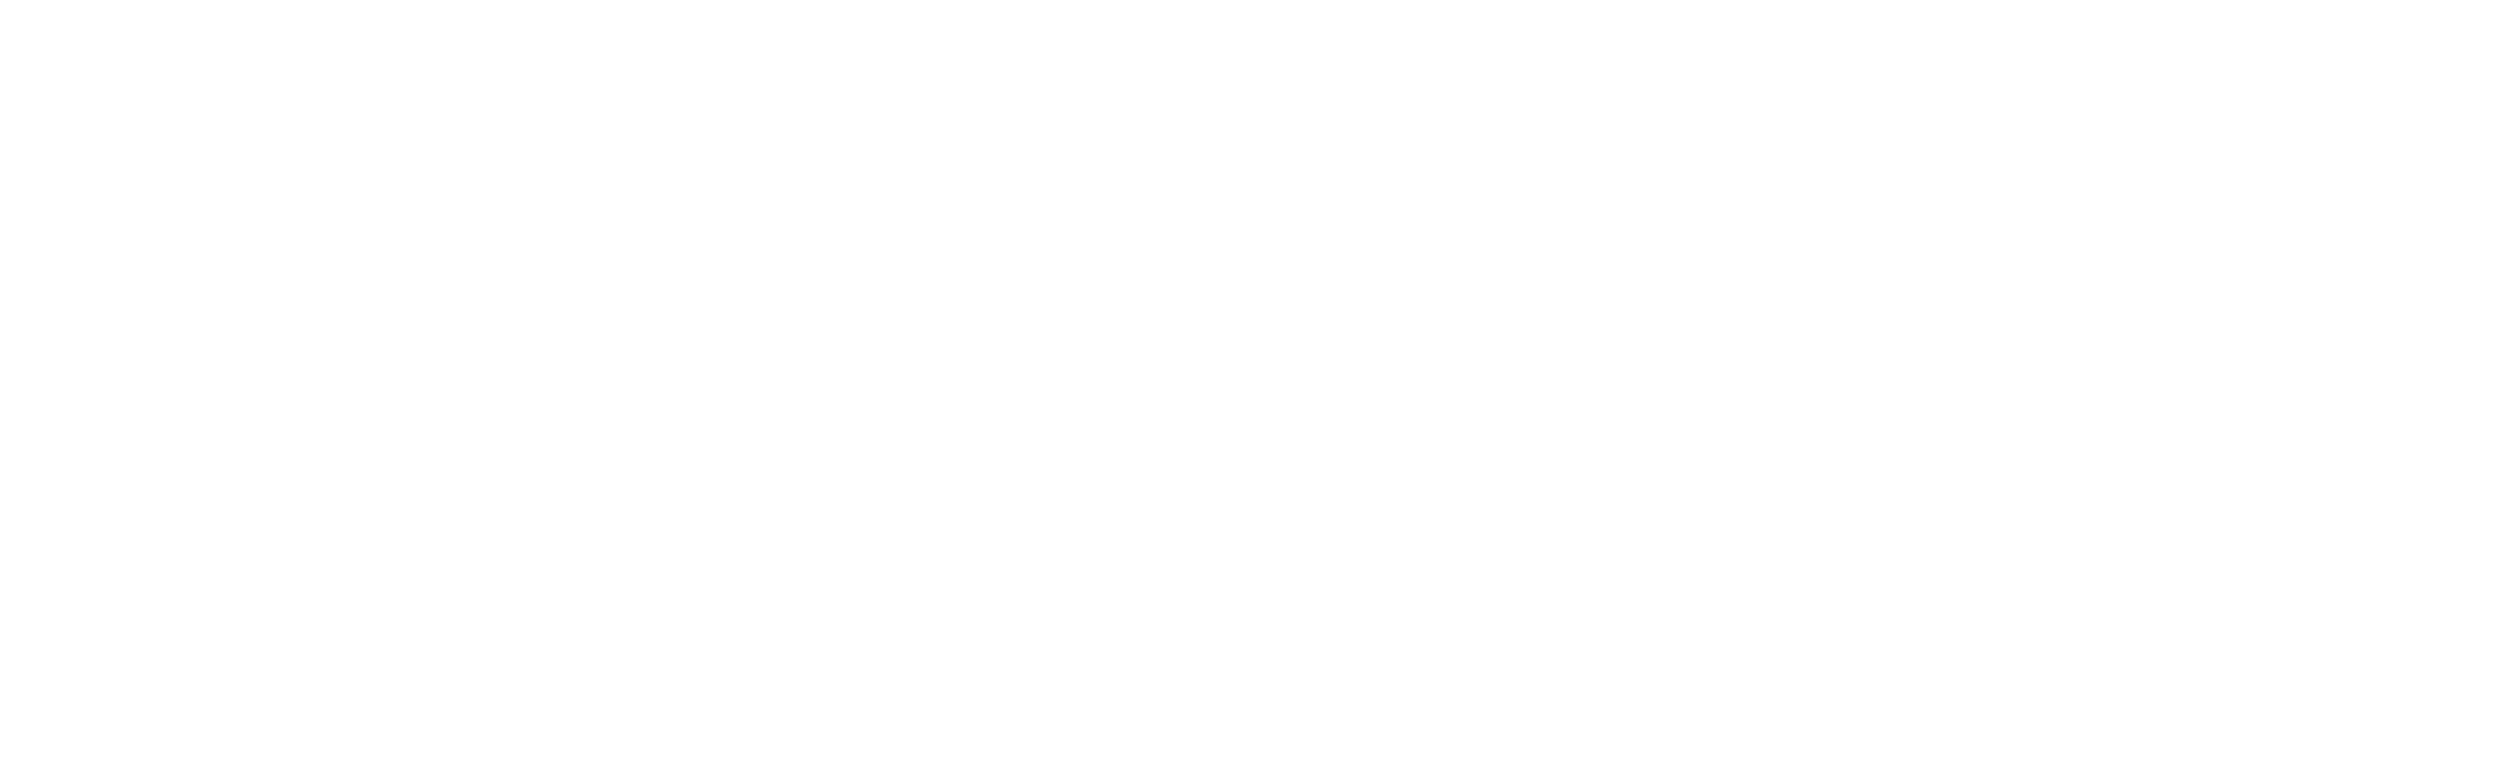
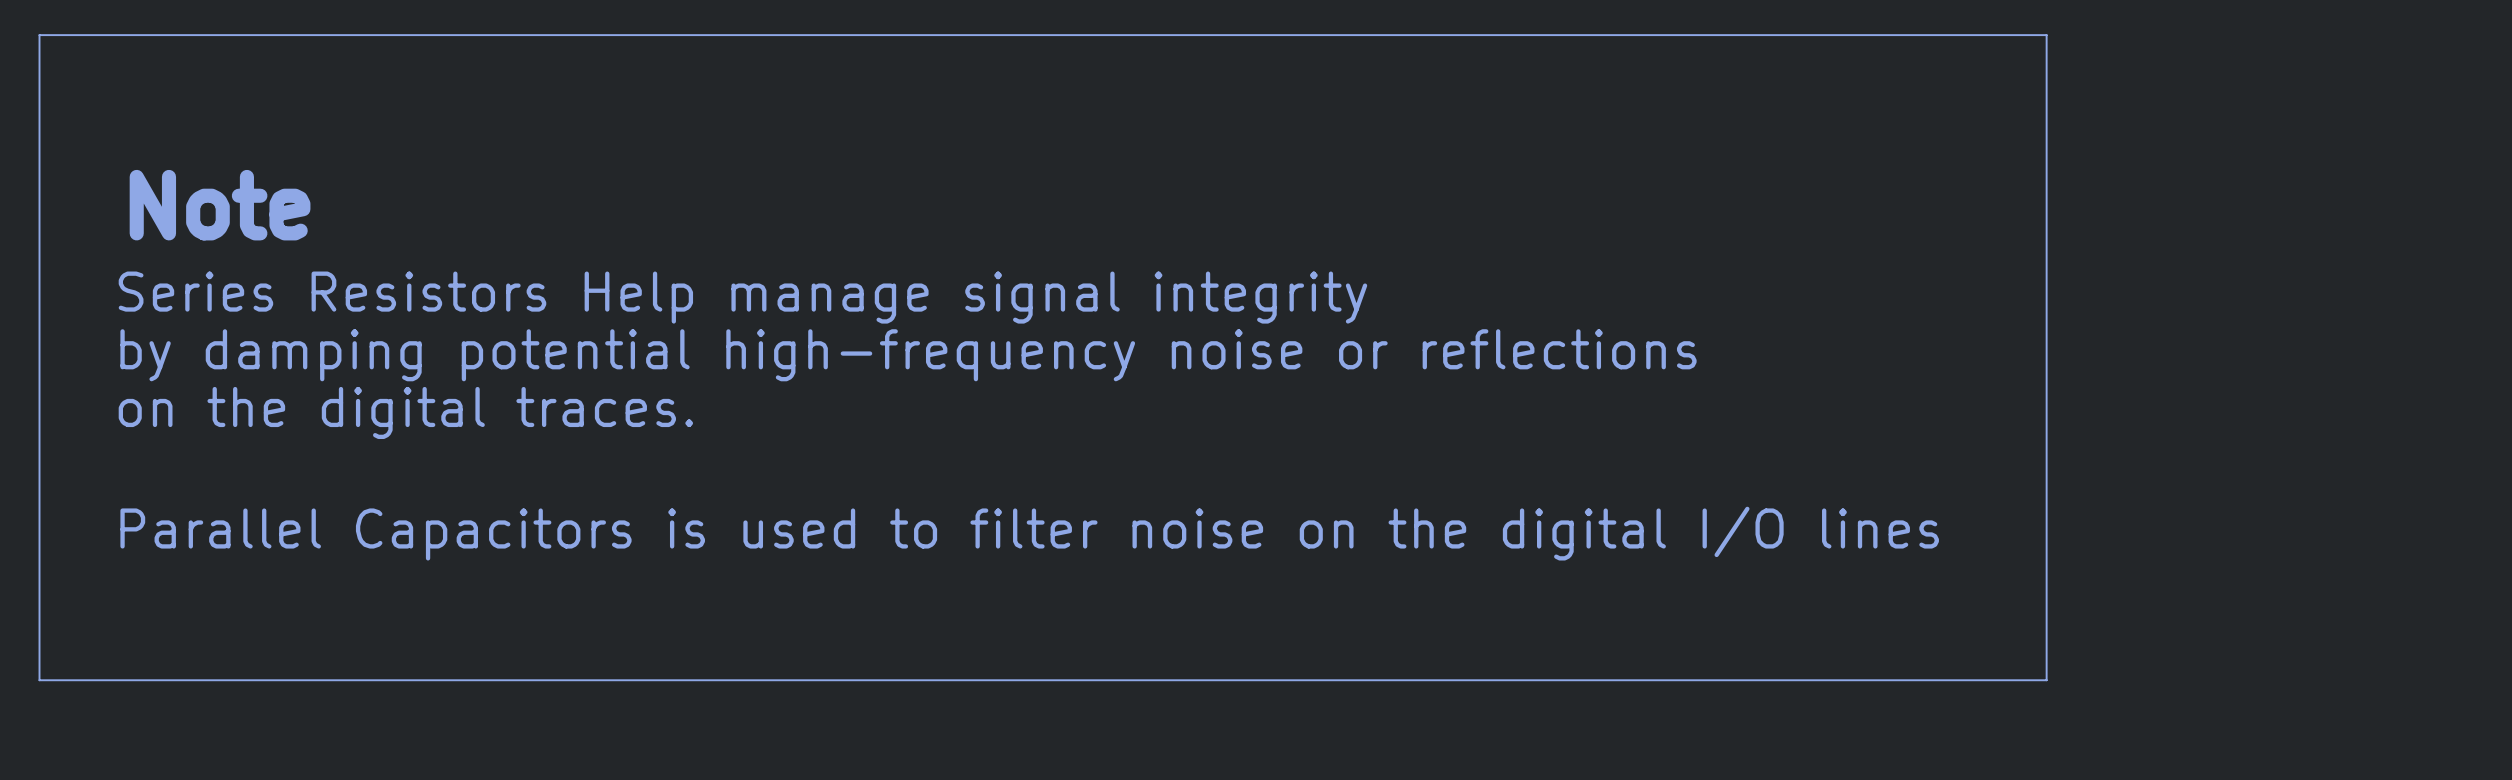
line: none -> (39, 35) (2046, 35) (2046, 680) (39, 680) (39, 35)
text: none -> Note (220, 205)
text: none -> Series Resistors Help manage signal integrity (742, 297)
text: none -> by damping potential high-frequency noise or reflections (908, 355)
text: none -> on the digital traces. (405, 412)
text: none -> Parallel Capacitors is used to filter noise on the digital I/O lines (1029, 533)

